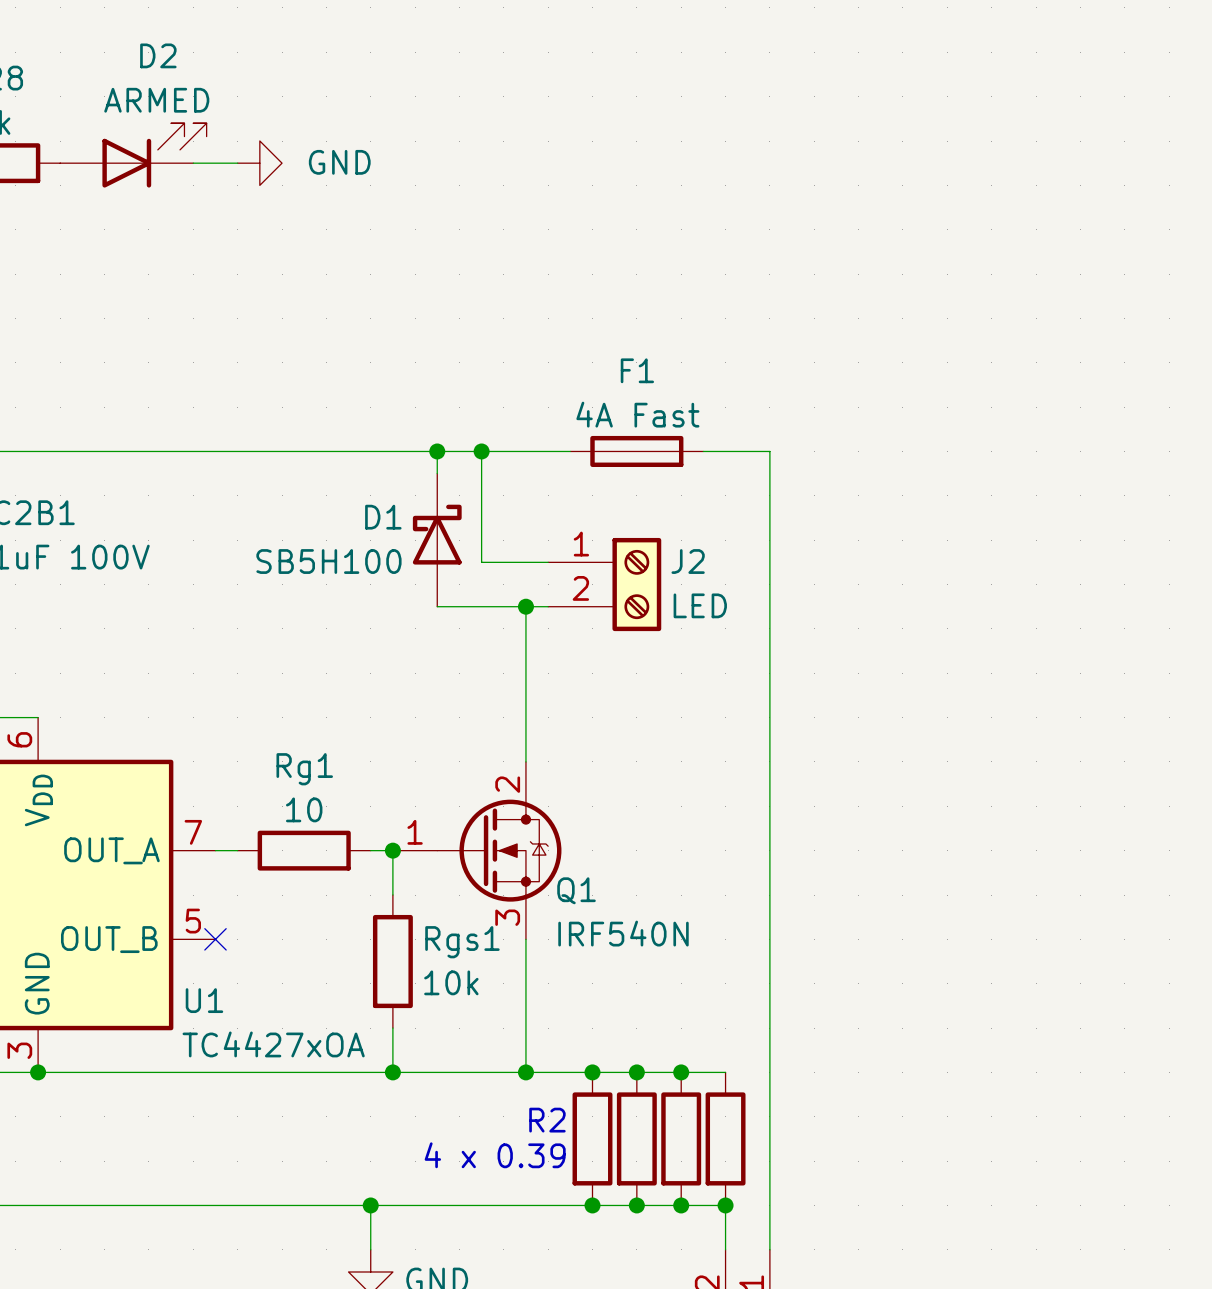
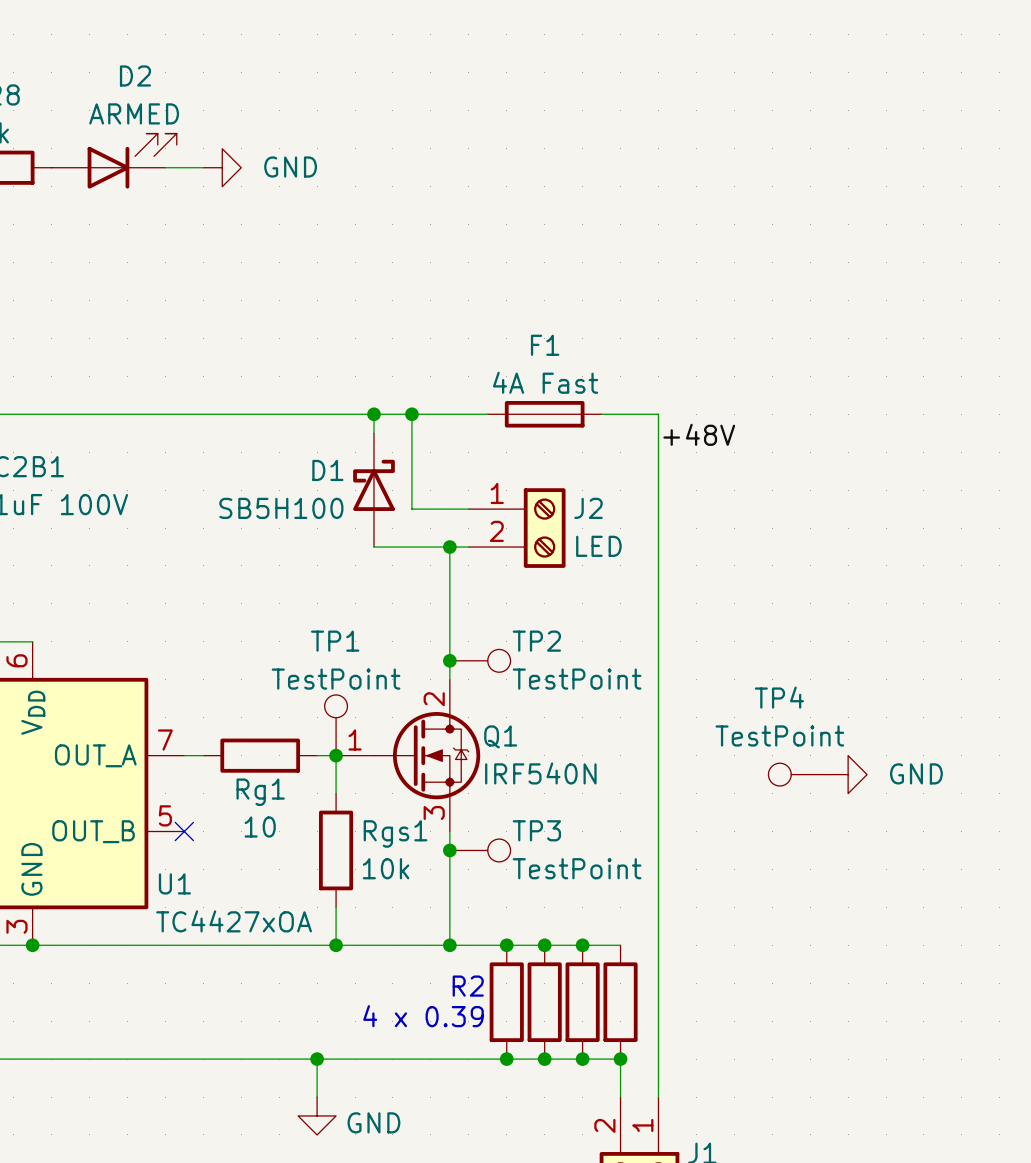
label: none -> +48V (699, 434)
junction: none -> (449, 660)
TP2: none -> TestPoint (480, 660)
Rg1 name position: Rg1 (304, 769) -> Rg1 (260, 792)
Rg1 value position: 10 (304, 809) -> 10 (260, 827)
TP1: none -> TestPoint (336, 725)
TP4: none -> TestPoint (798, 774)
power symbol: none -> GND (848, 774)
Q1 name position: Q1 (576, 890) -> Q1 (500, 736)
Q1 value position: IRF540N (623, 933) -> IRF540N (540, 773)
junction: none -> (449, 850)
TP3: none -> TestPoint (480, 850)

